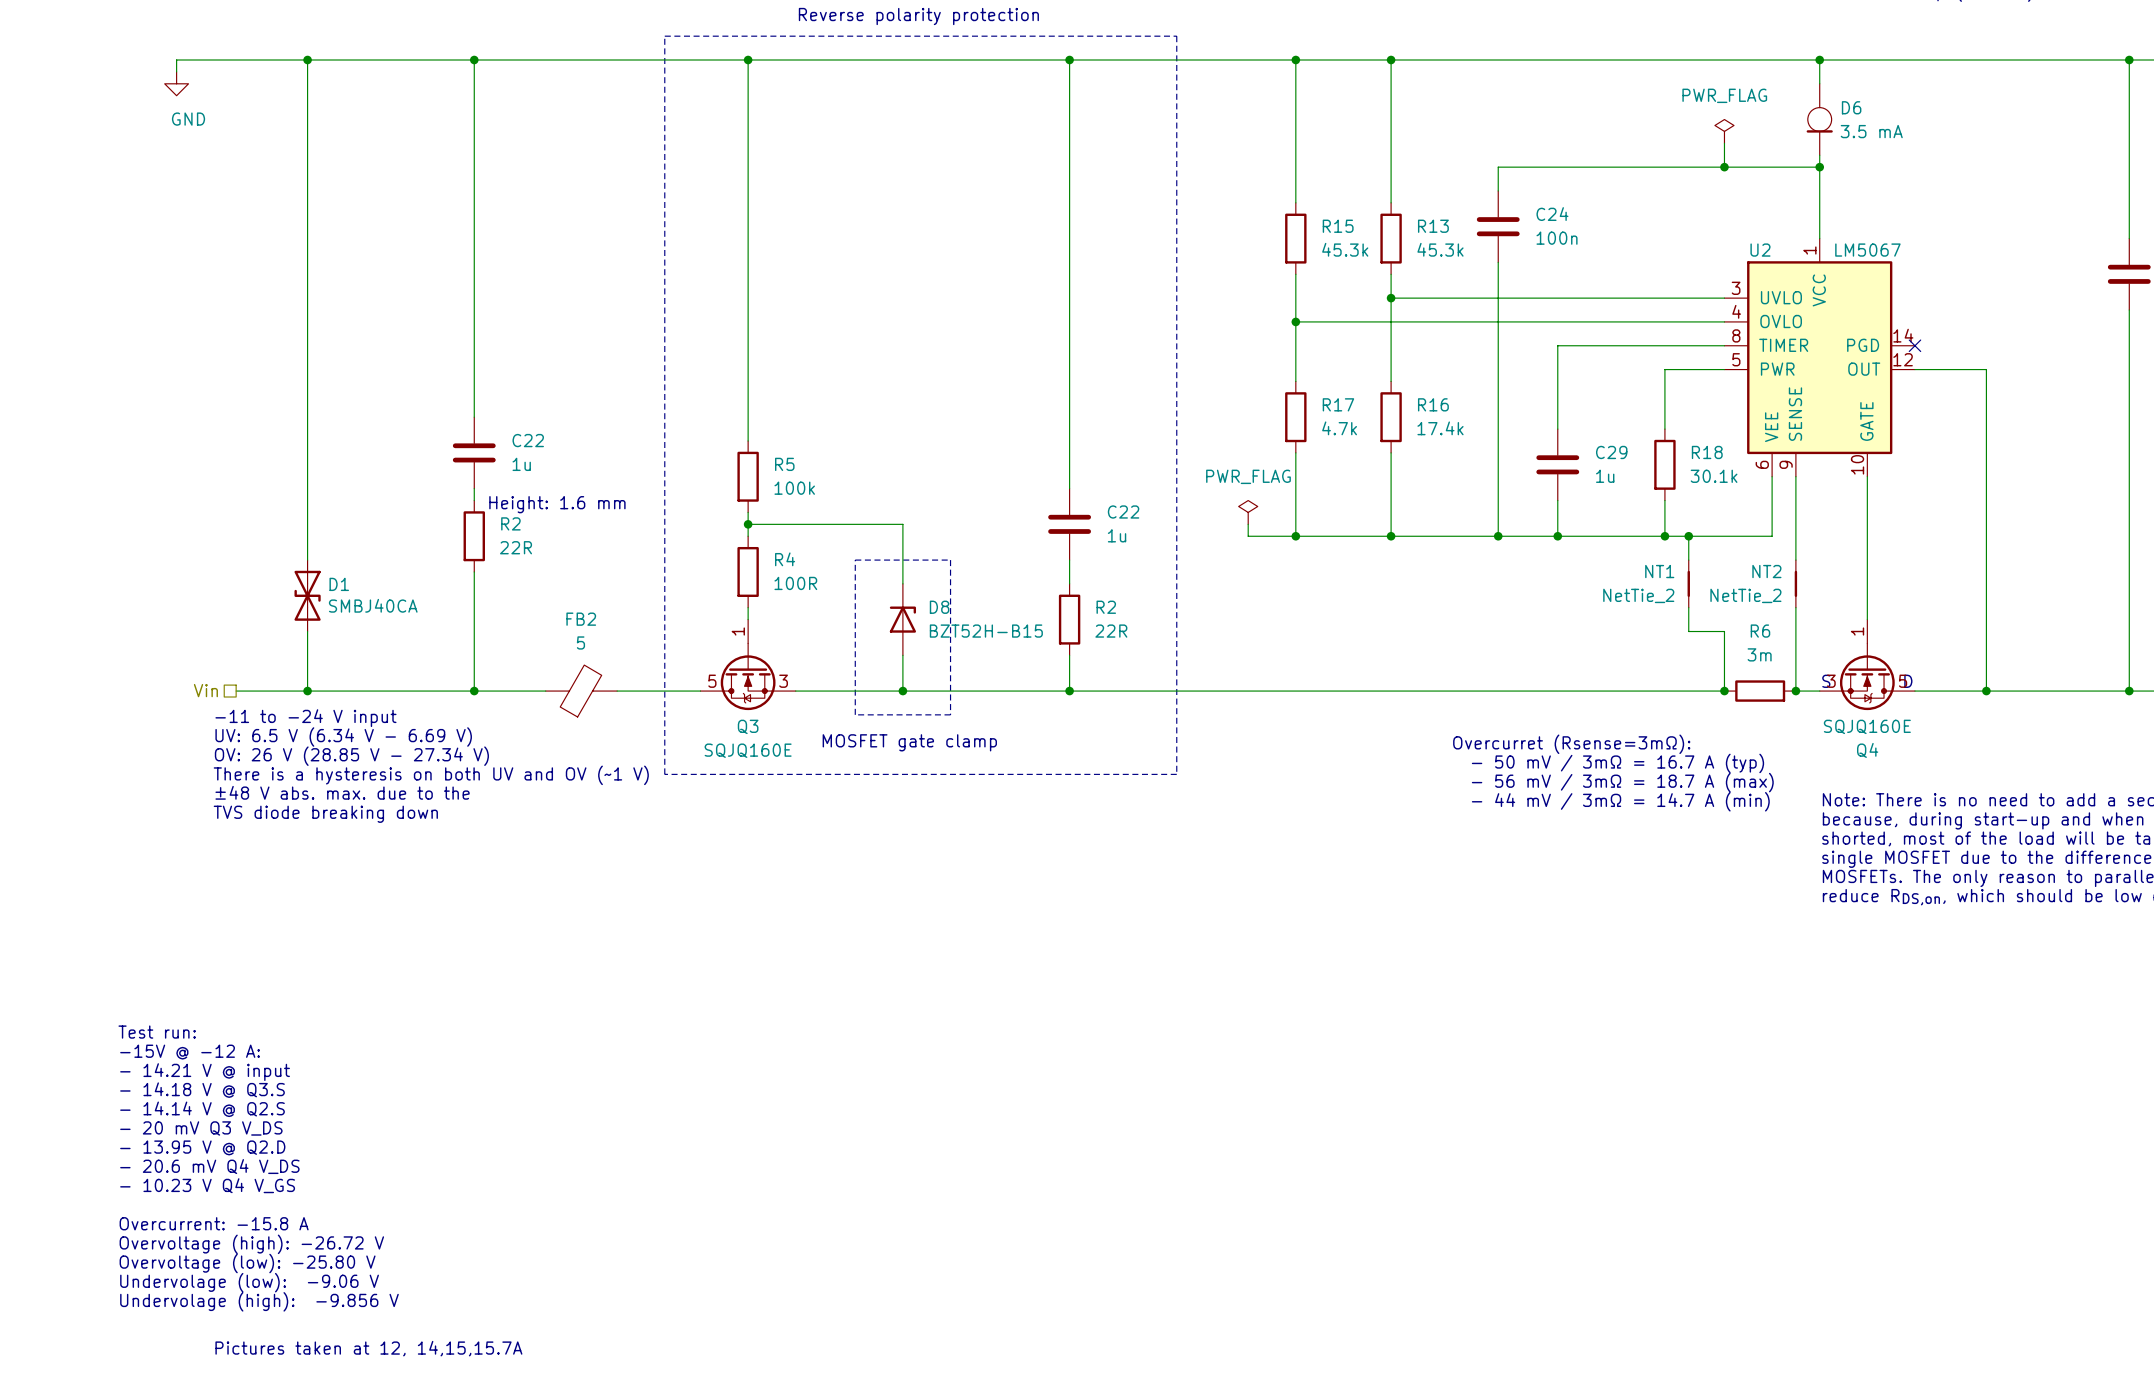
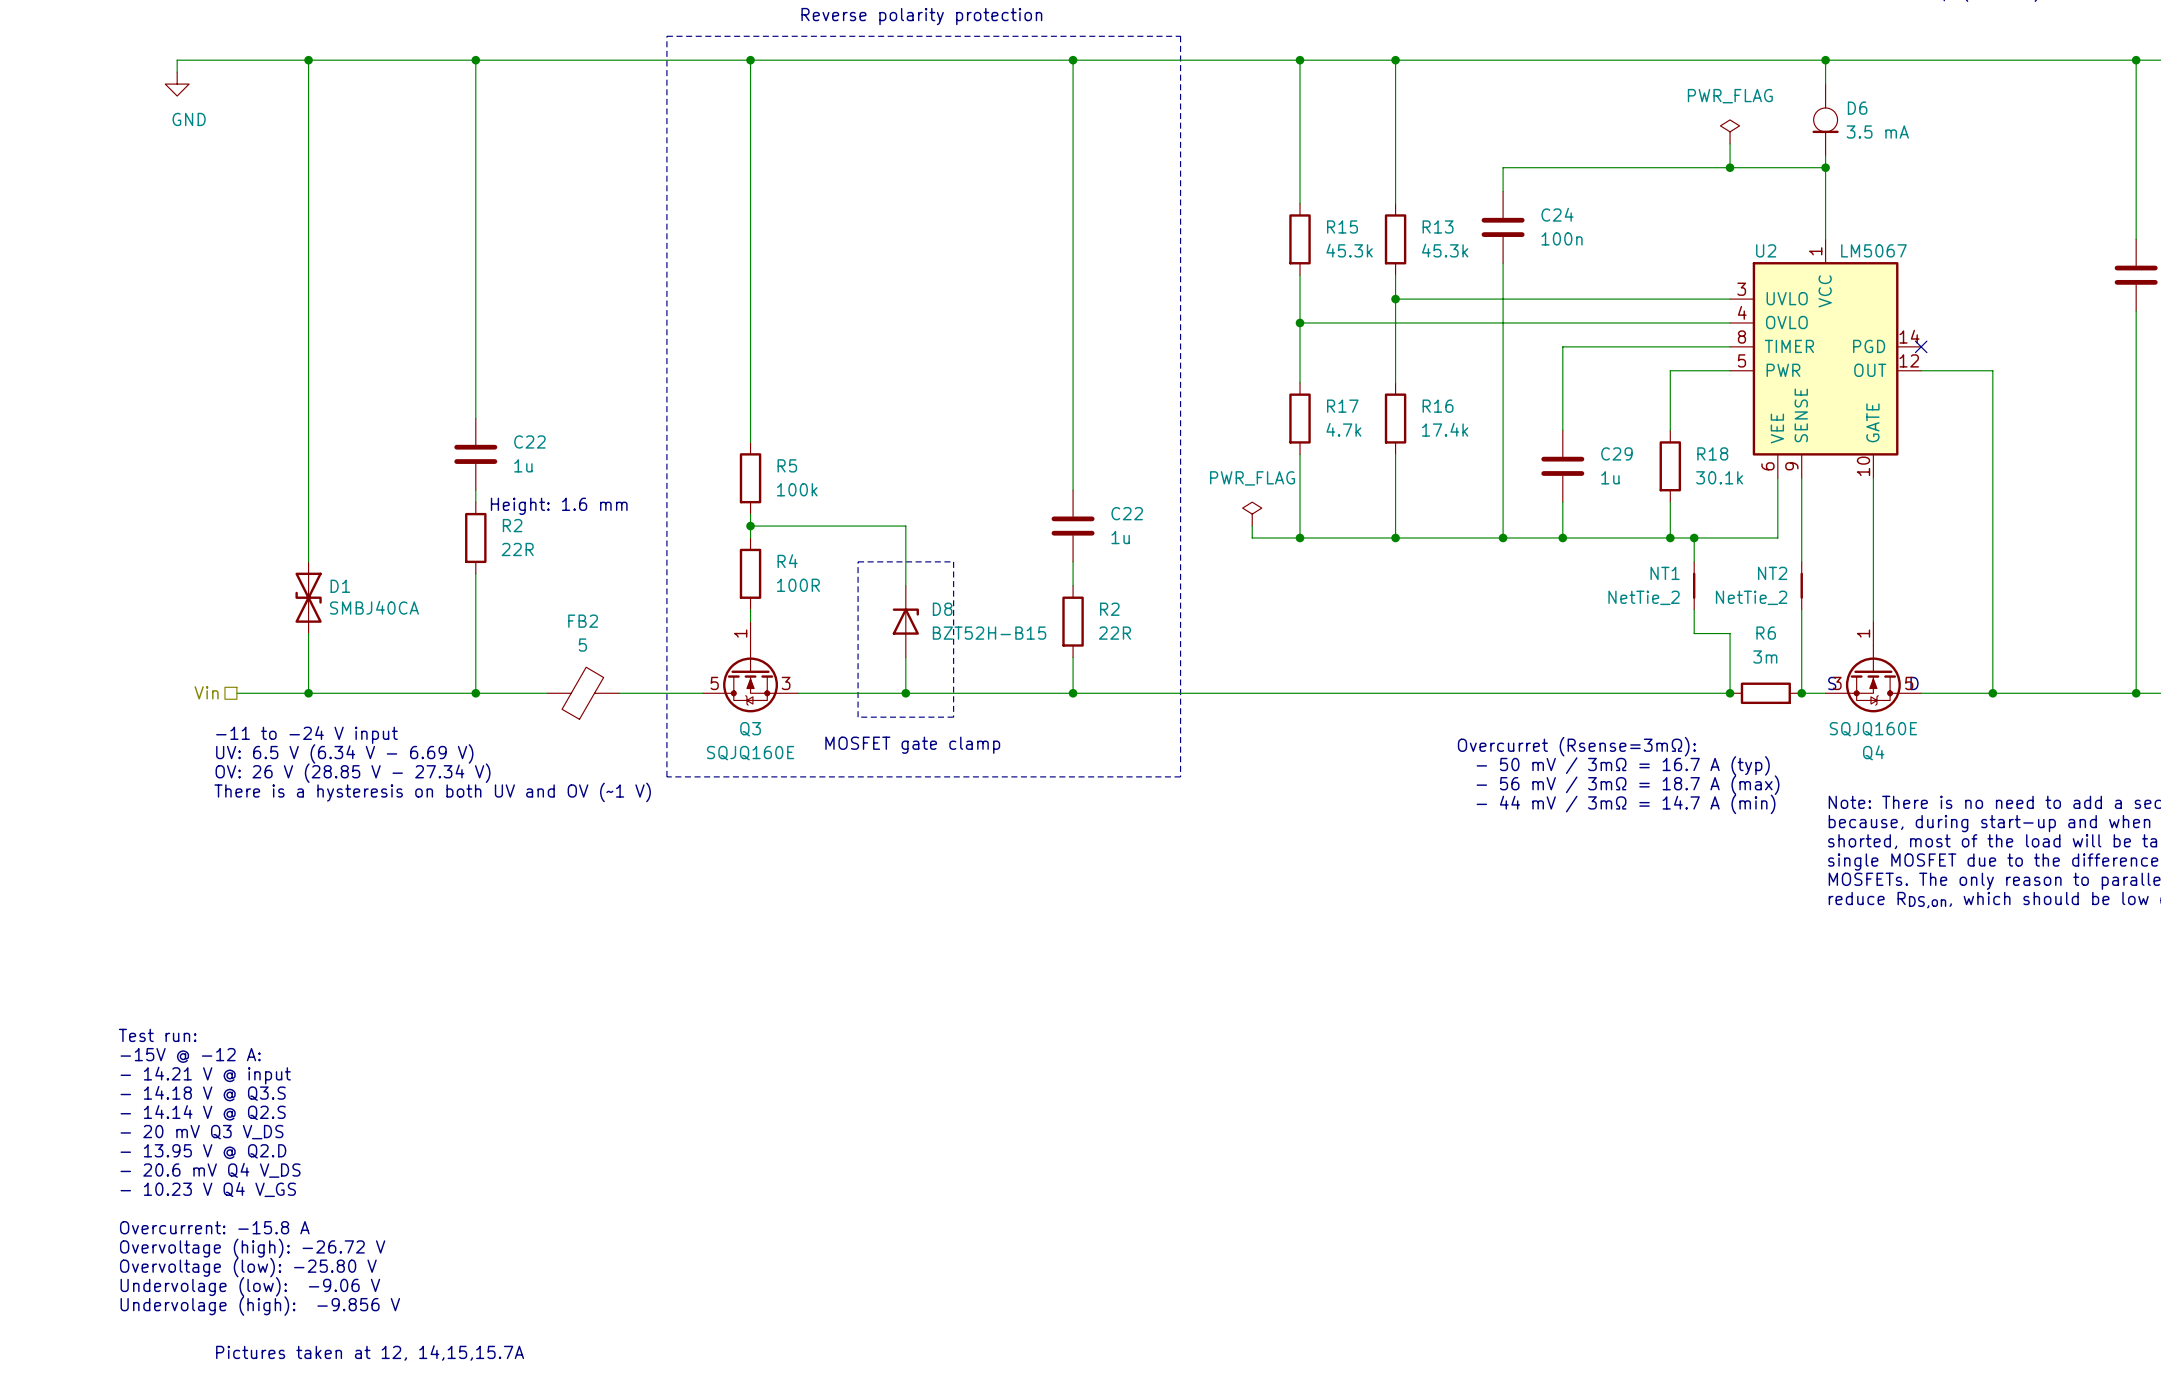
text: -11 to -24 V input (305, 718) -> none
text: UV: 6.5 V (6.34 V - 6.69 V) (343, 737) -> -11 to -24 V input (306, 735)
text: OV: 26 V (28.85 V - 27.34 V) (351, 756) -> UV: 6.5 V (6.34 V - 6.69 V) (344, 753)
text: There is a hysteresis on both UV and OV (~1 V) (431, 775) -> OV: 26 V (28.85 V - 27.34 V) (353, 773)
text: ±48 V abs. max. due to the (342, 792) -> There is a hysteresis on both UV and OV (~1 V) (432, 792)
text: TVS diode breaking down (325, 814) -> none

